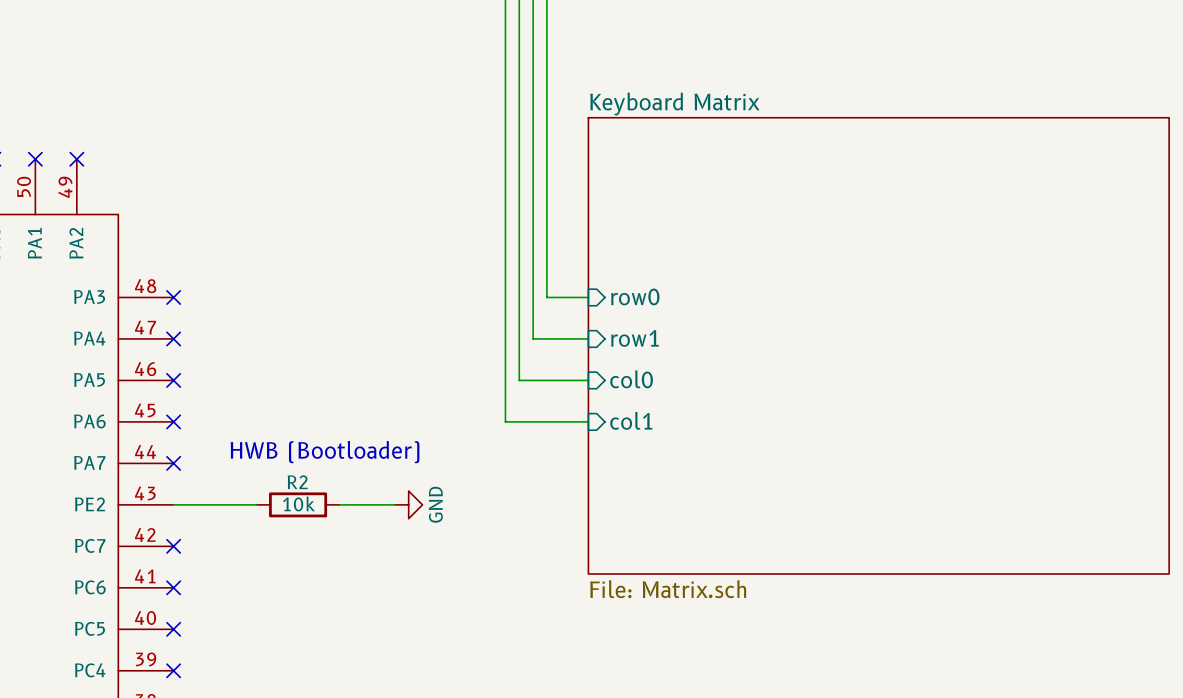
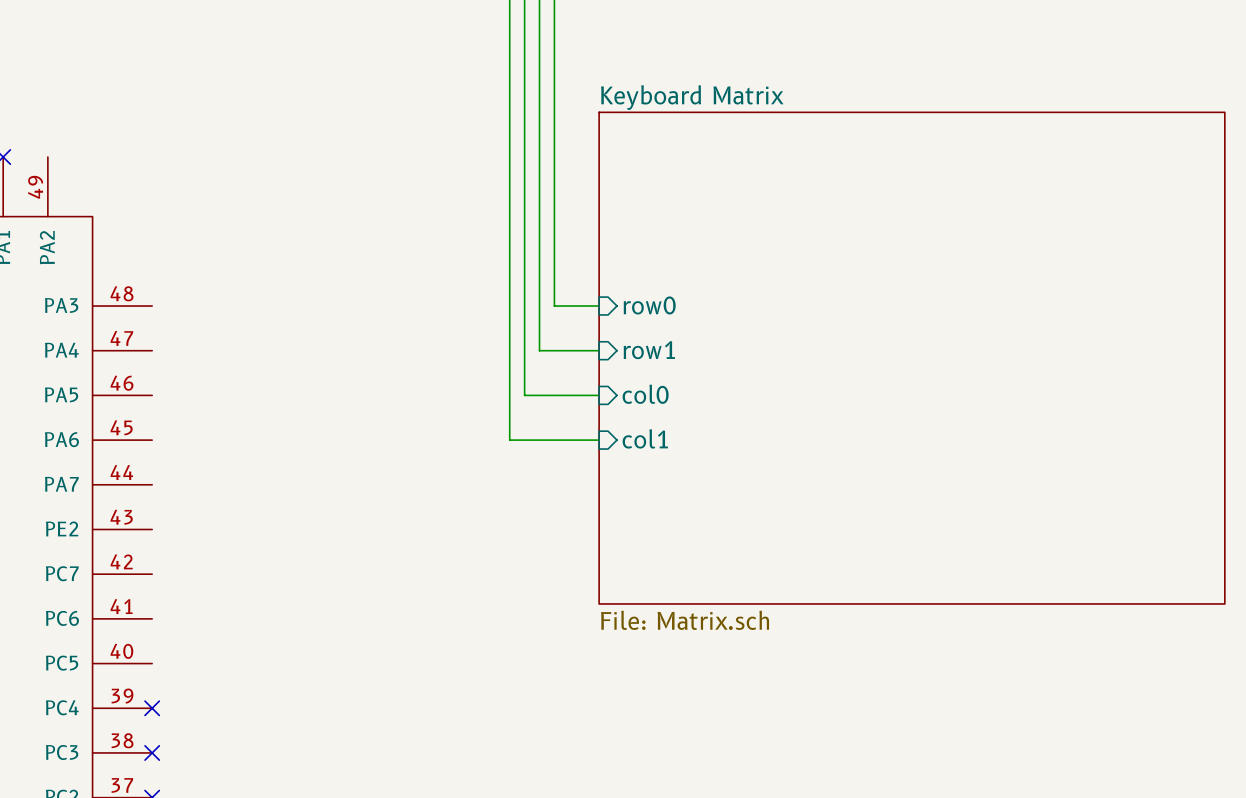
no-connect mark: (76, 159) -> none
no-connect mark: (173, 297) -> none
no-connect mark: (173, 338) -> none
no-connect mark: (173, 380) -> none
no-connect mark: (173, 421) -> none
text: HWB (Bootloader) (324, 452) -> none
no-connect mark: (173, 463) -> none
wire: (173, 504) (256, 504) -> none
R2: 10k (298, 504) -> none
wire: (339, 504) (394, 504) -> none
power symbol: GND (408, 504) -> none
no-connect mark: (173, 546) -> none
no-connect mark: (173, 587) -> none
no-connect mark: (173, 629) -> none

